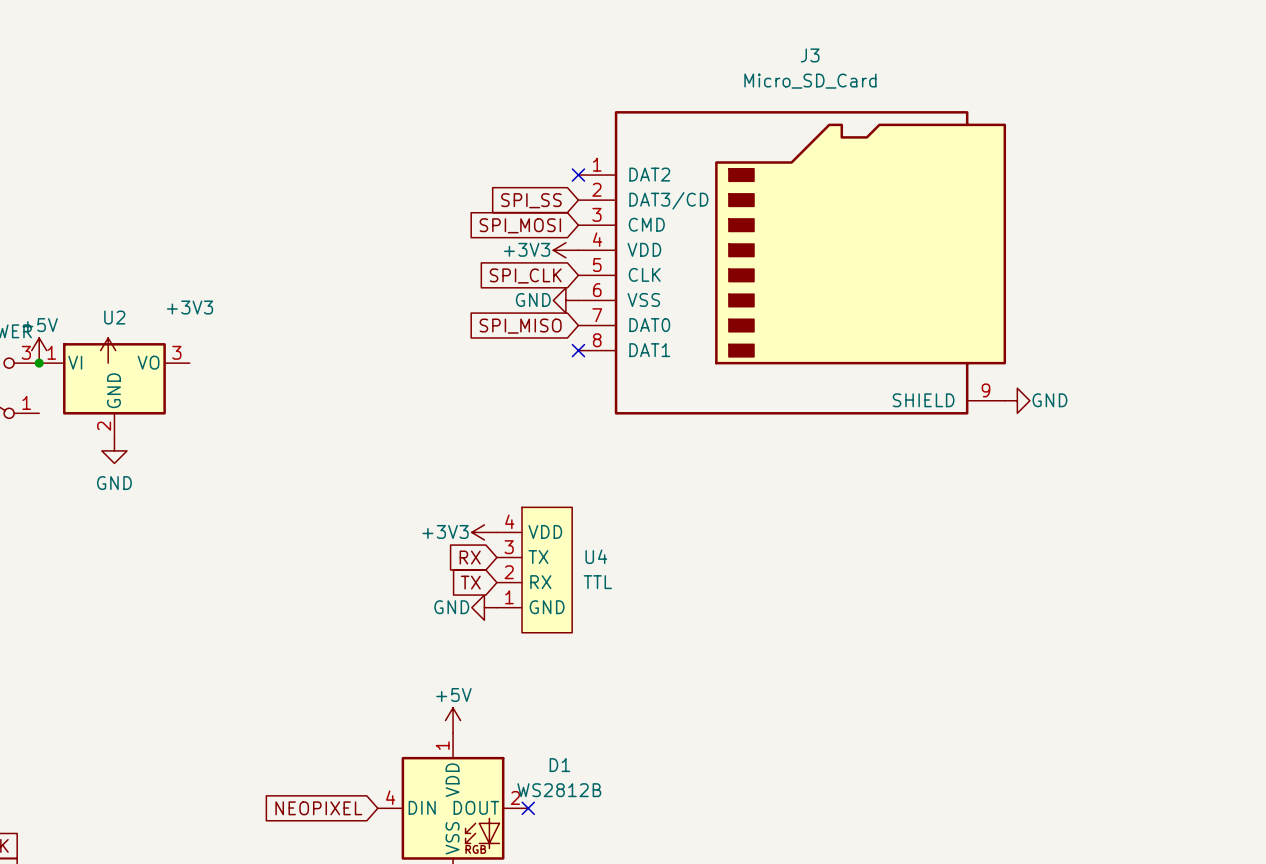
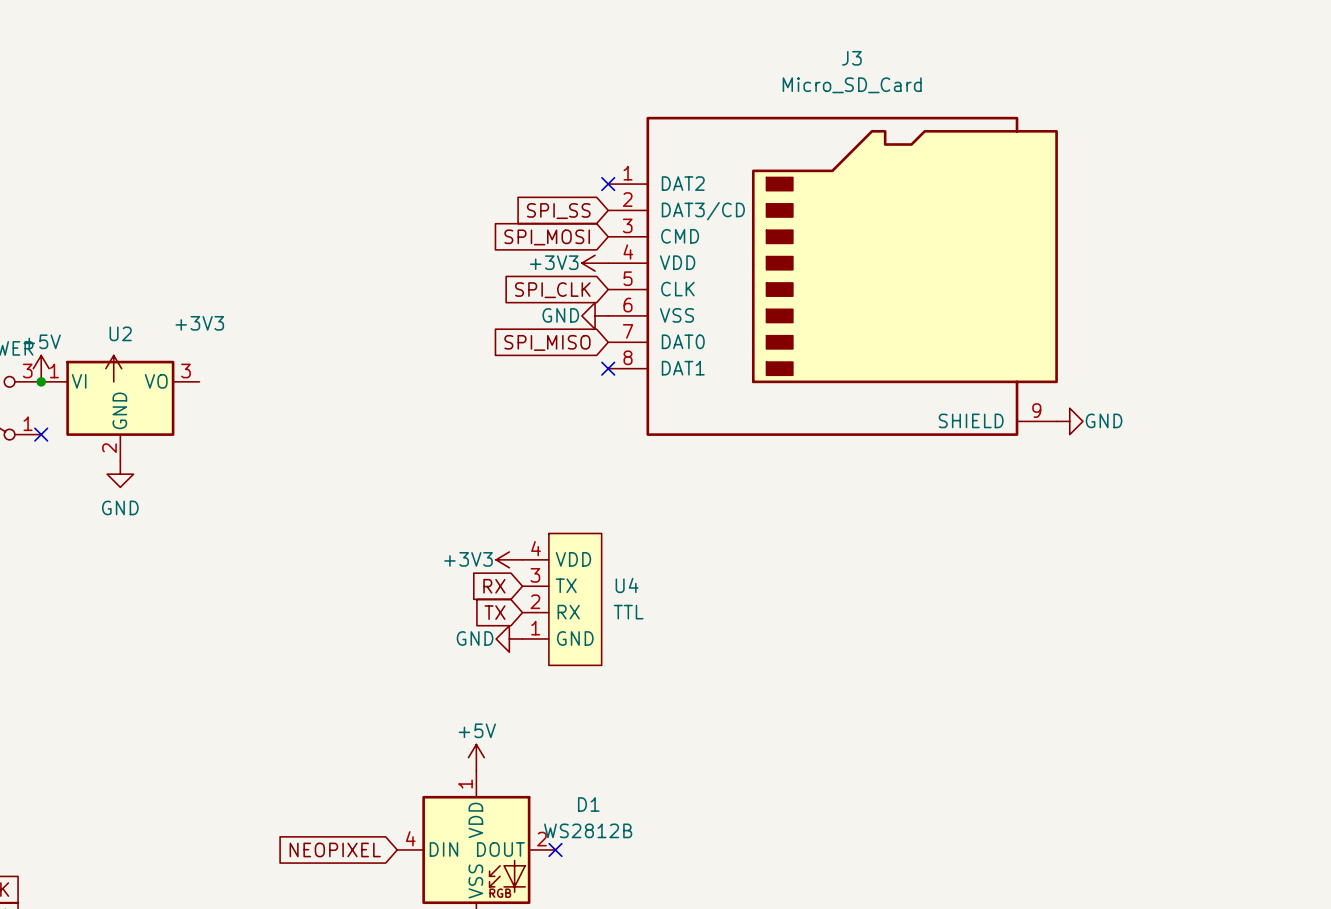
no-connect mark: none -> (41, 434)

